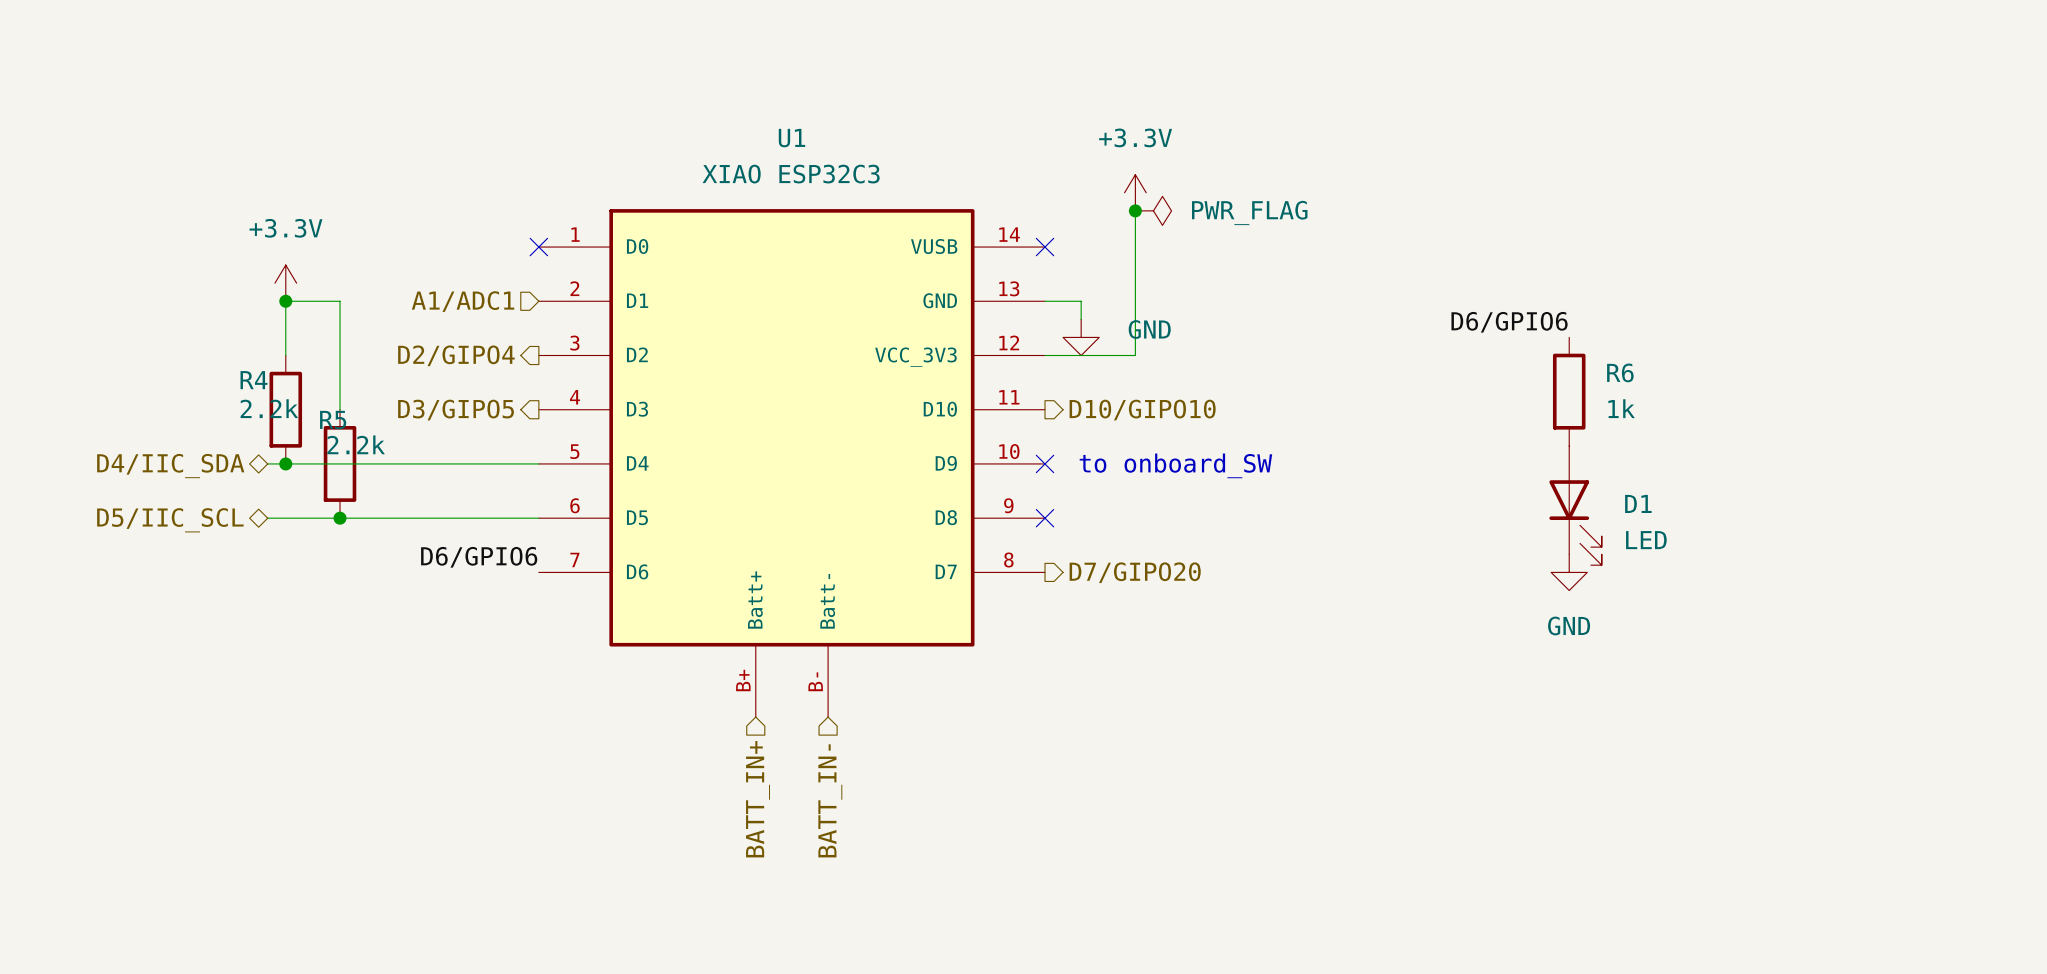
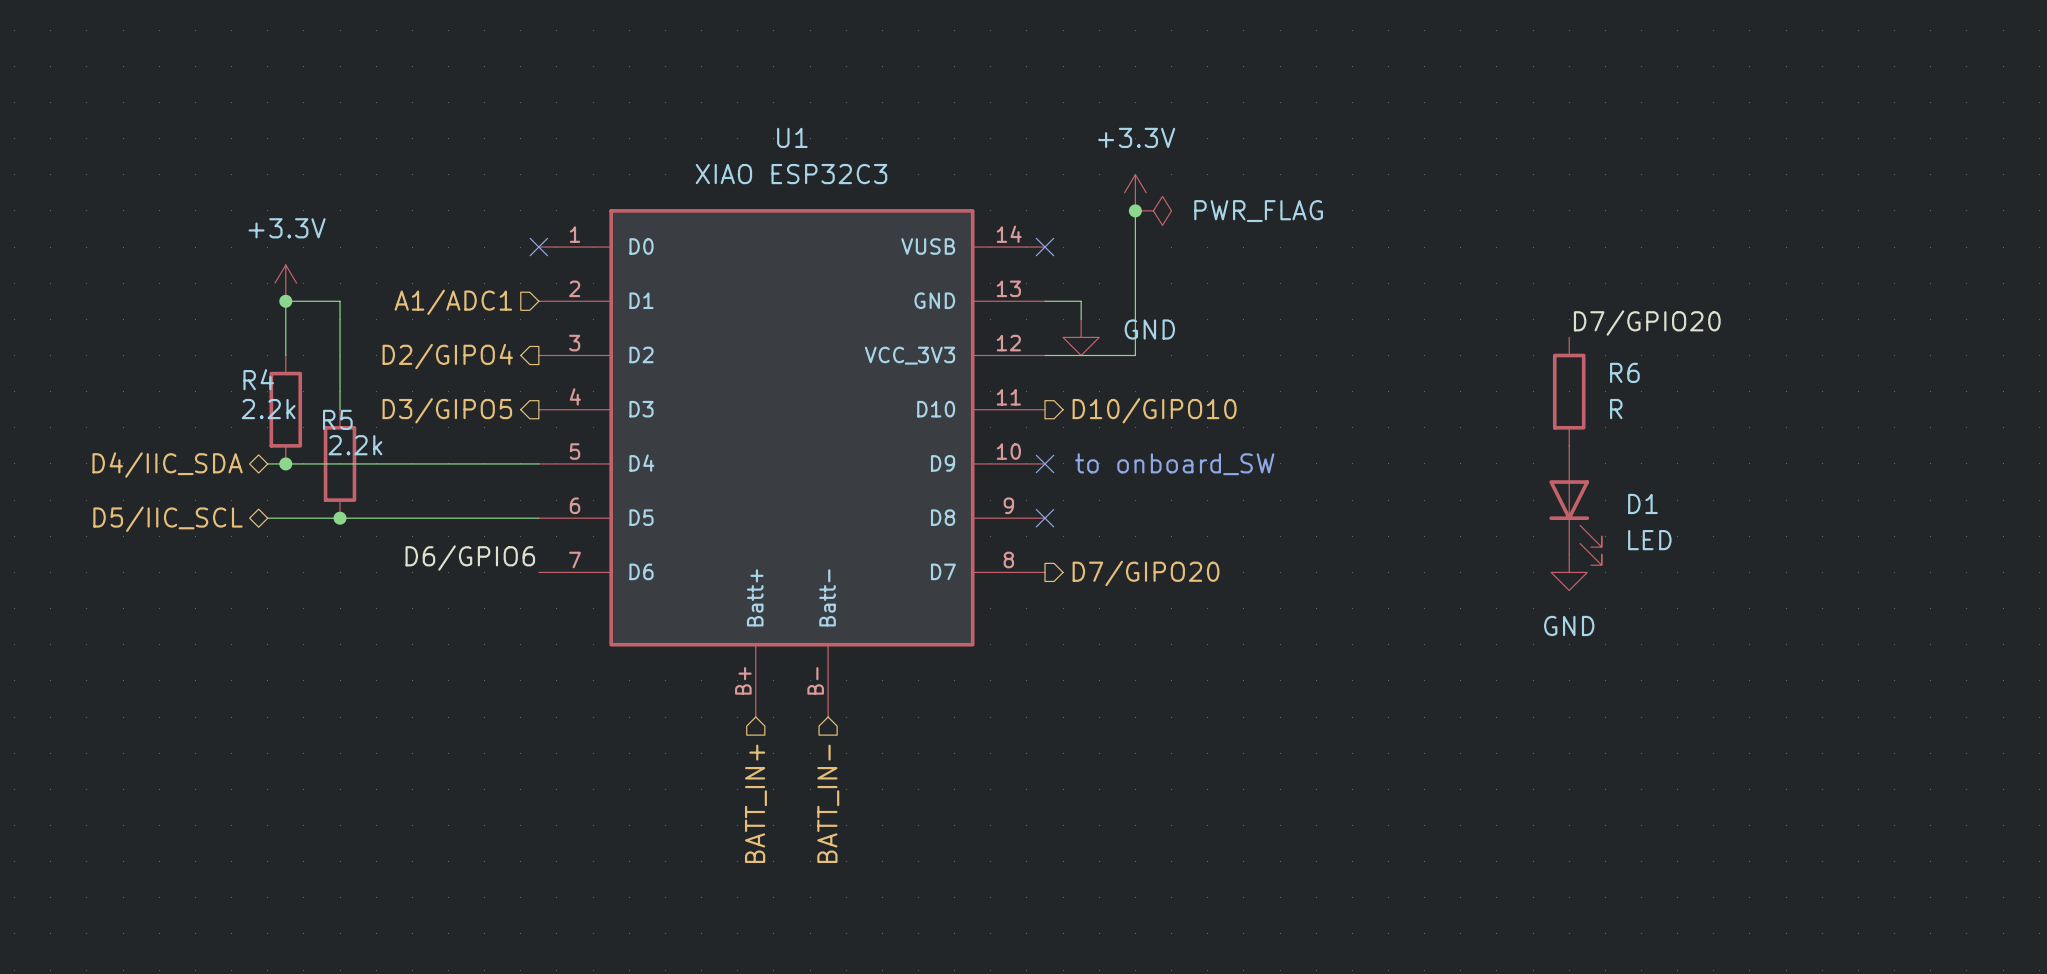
label: D6/GPIO6 (1509, 322) -> D7/GPIO20 (1647, 323)
R6 value: 1k (1621, 408) -> R (1616, 409)

